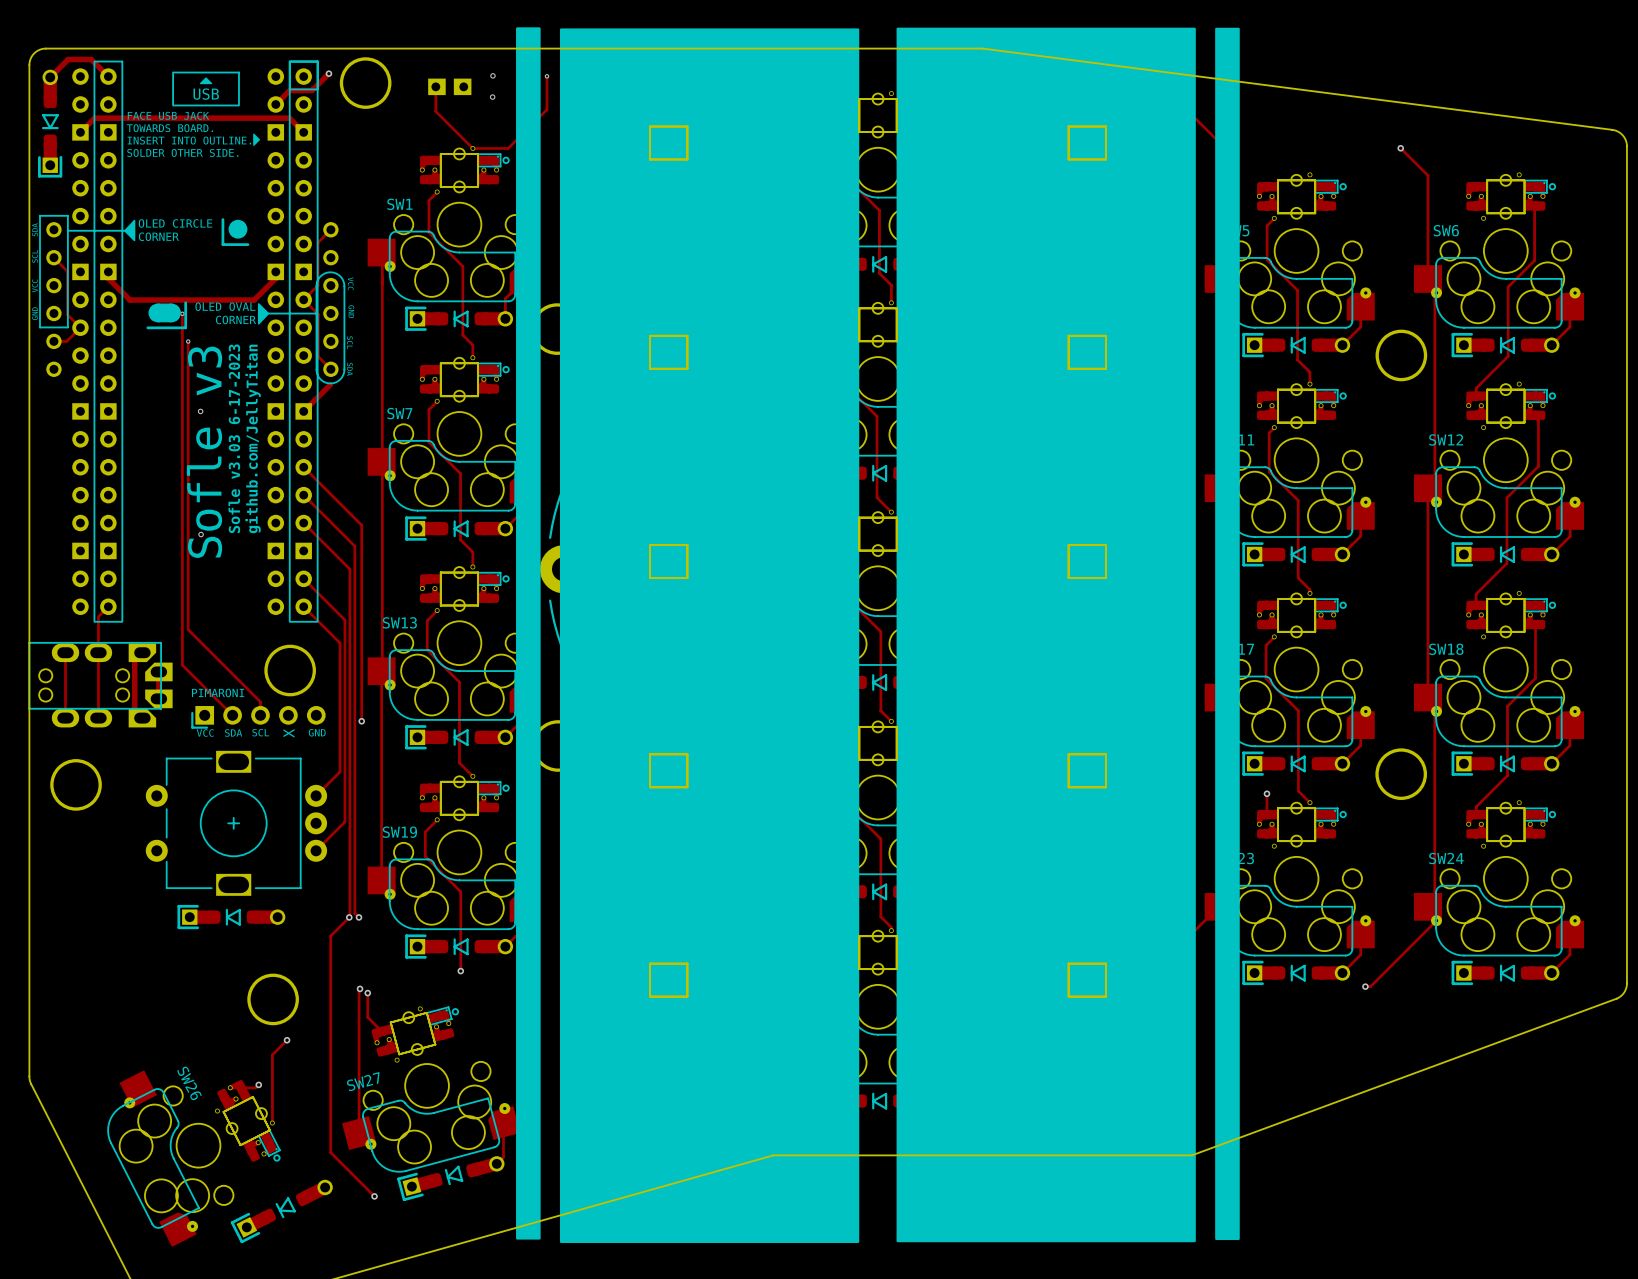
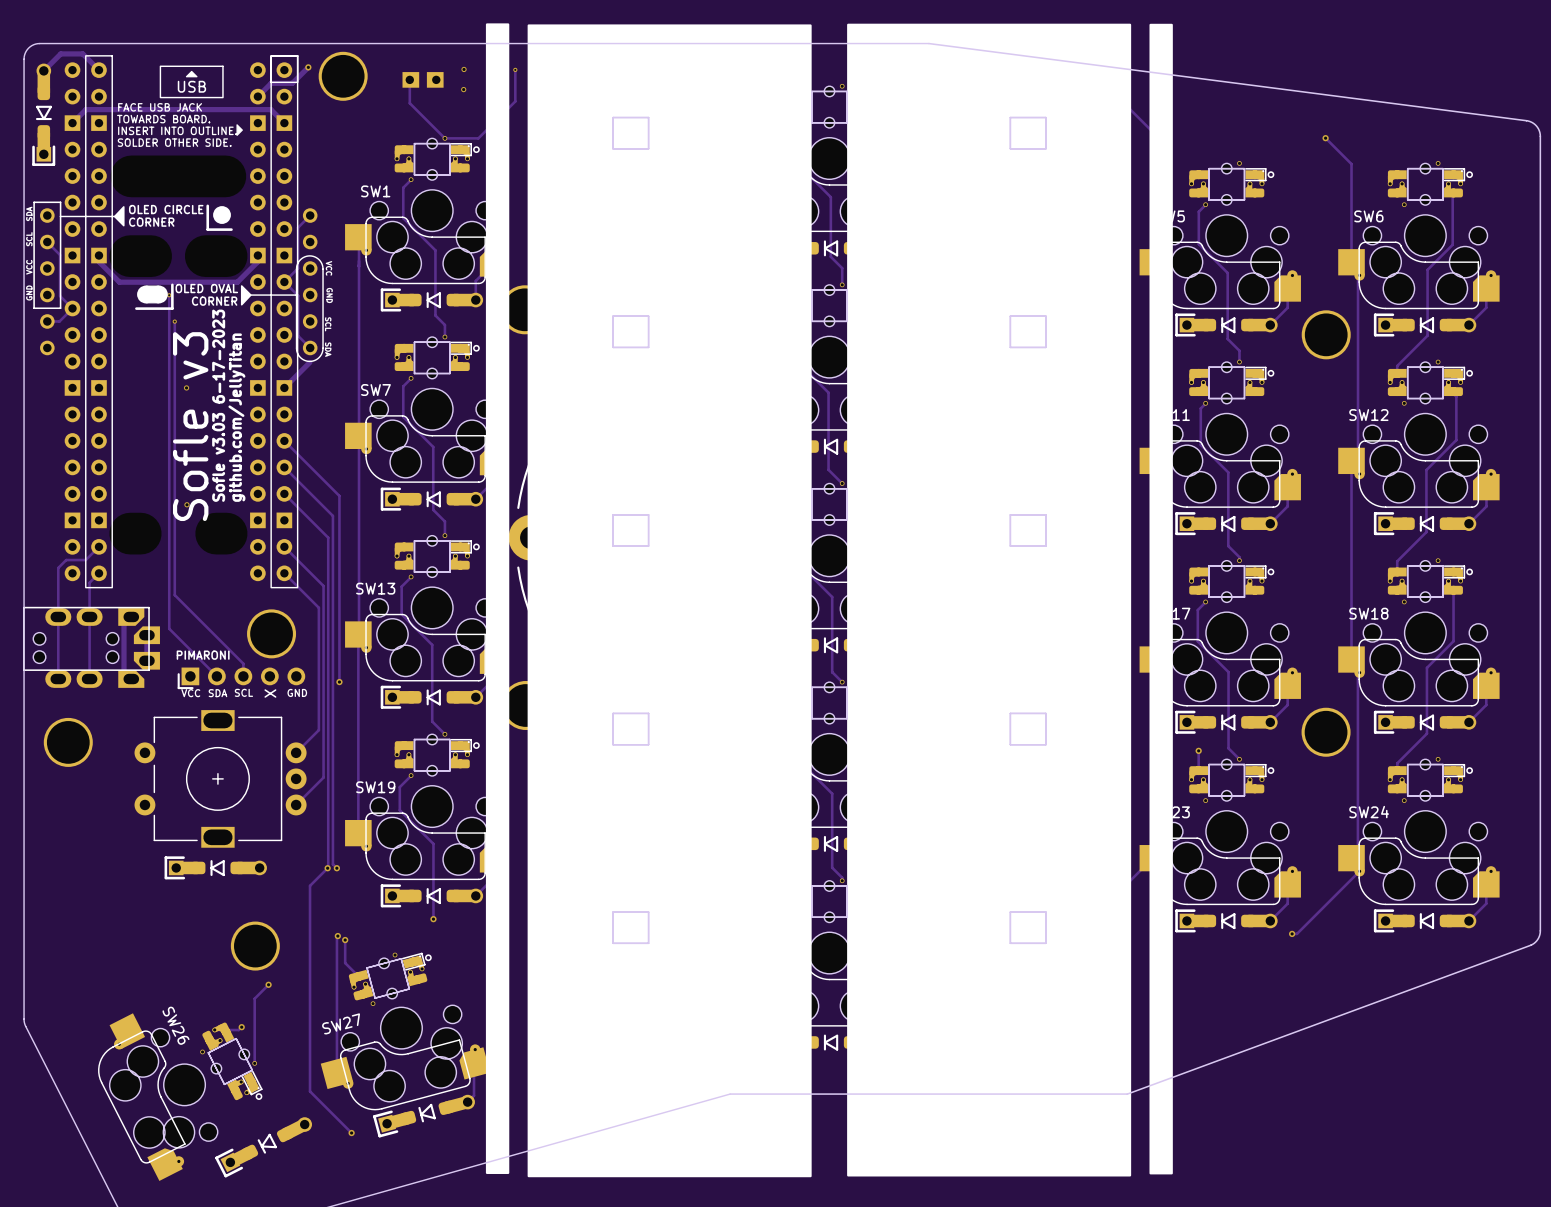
track: none -> (98, 546) (85, 560) (66, 560) (58, 567) (58, 616)

